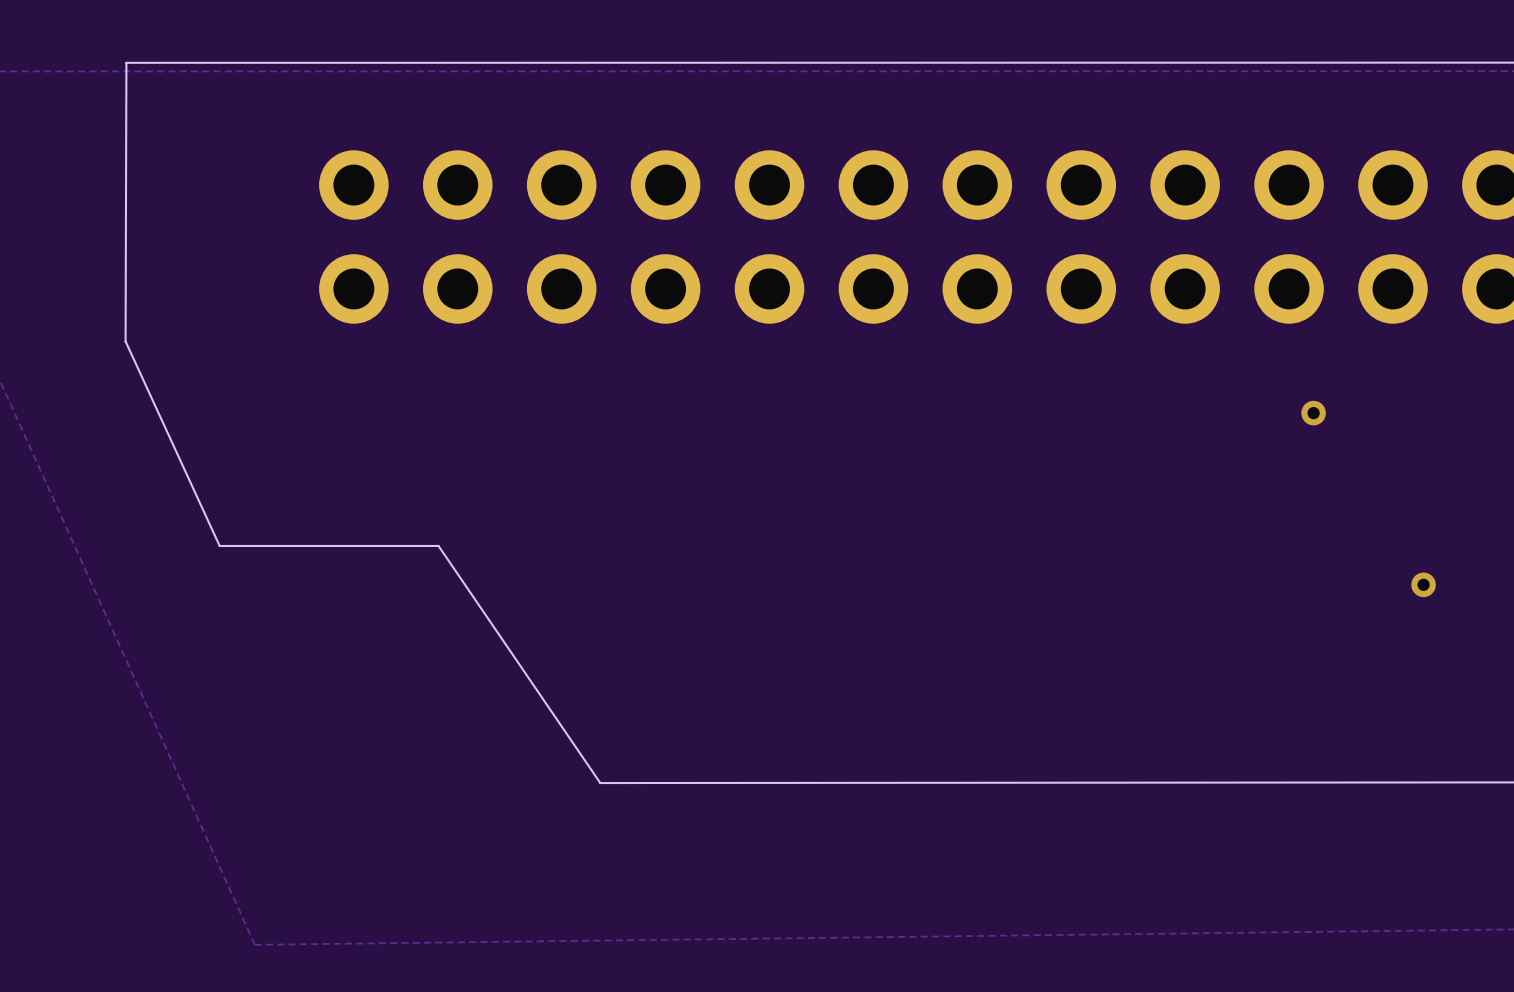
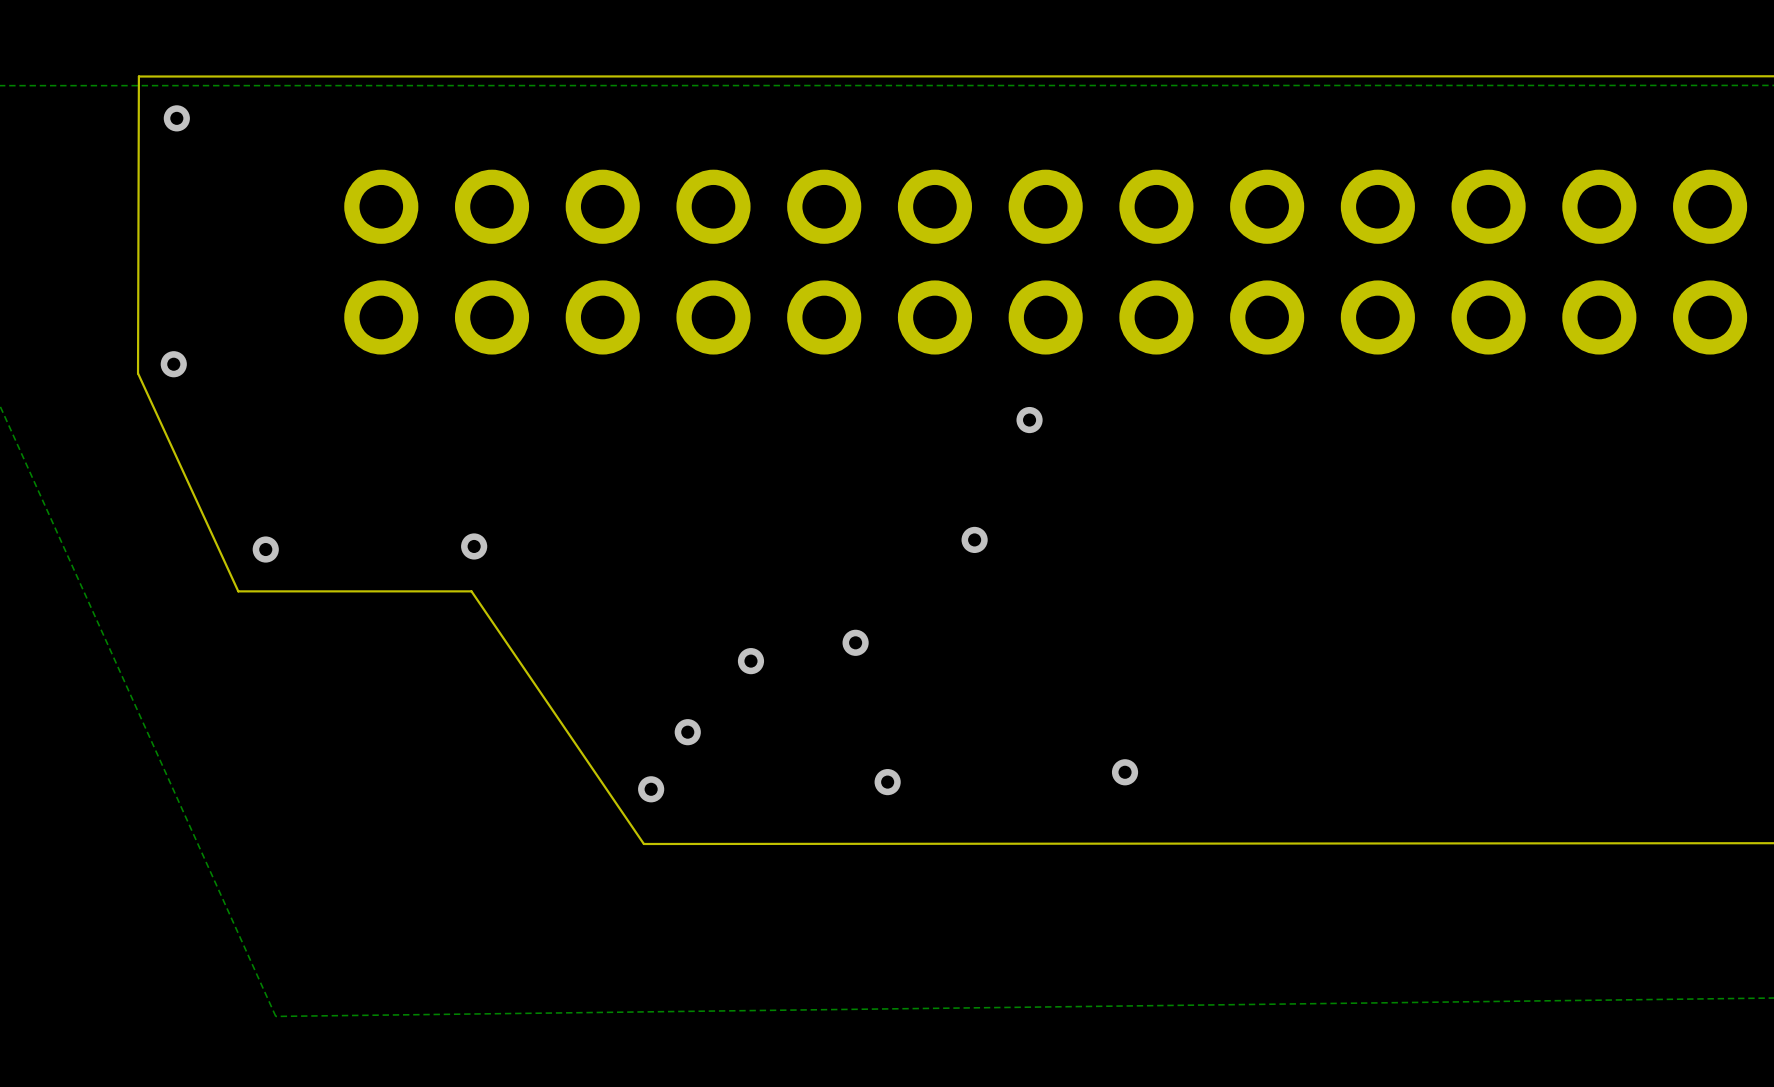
via: none -> (176, 118)
via: none -> (173, 364)
via: none -> (1029, 420)
via: (1313, 413) -> none
via: none -> (974, 539)
via: none -> (474, 546)
via: none -> (265, 549)
via: (1423, 584) -> none
via: none -> (855, 642)
via: none -> (750, 661)
via: none -> (687, 732)
via: none -> (1125, 772)
via: none -> (887, 782)
via: none -> (651, 789)

